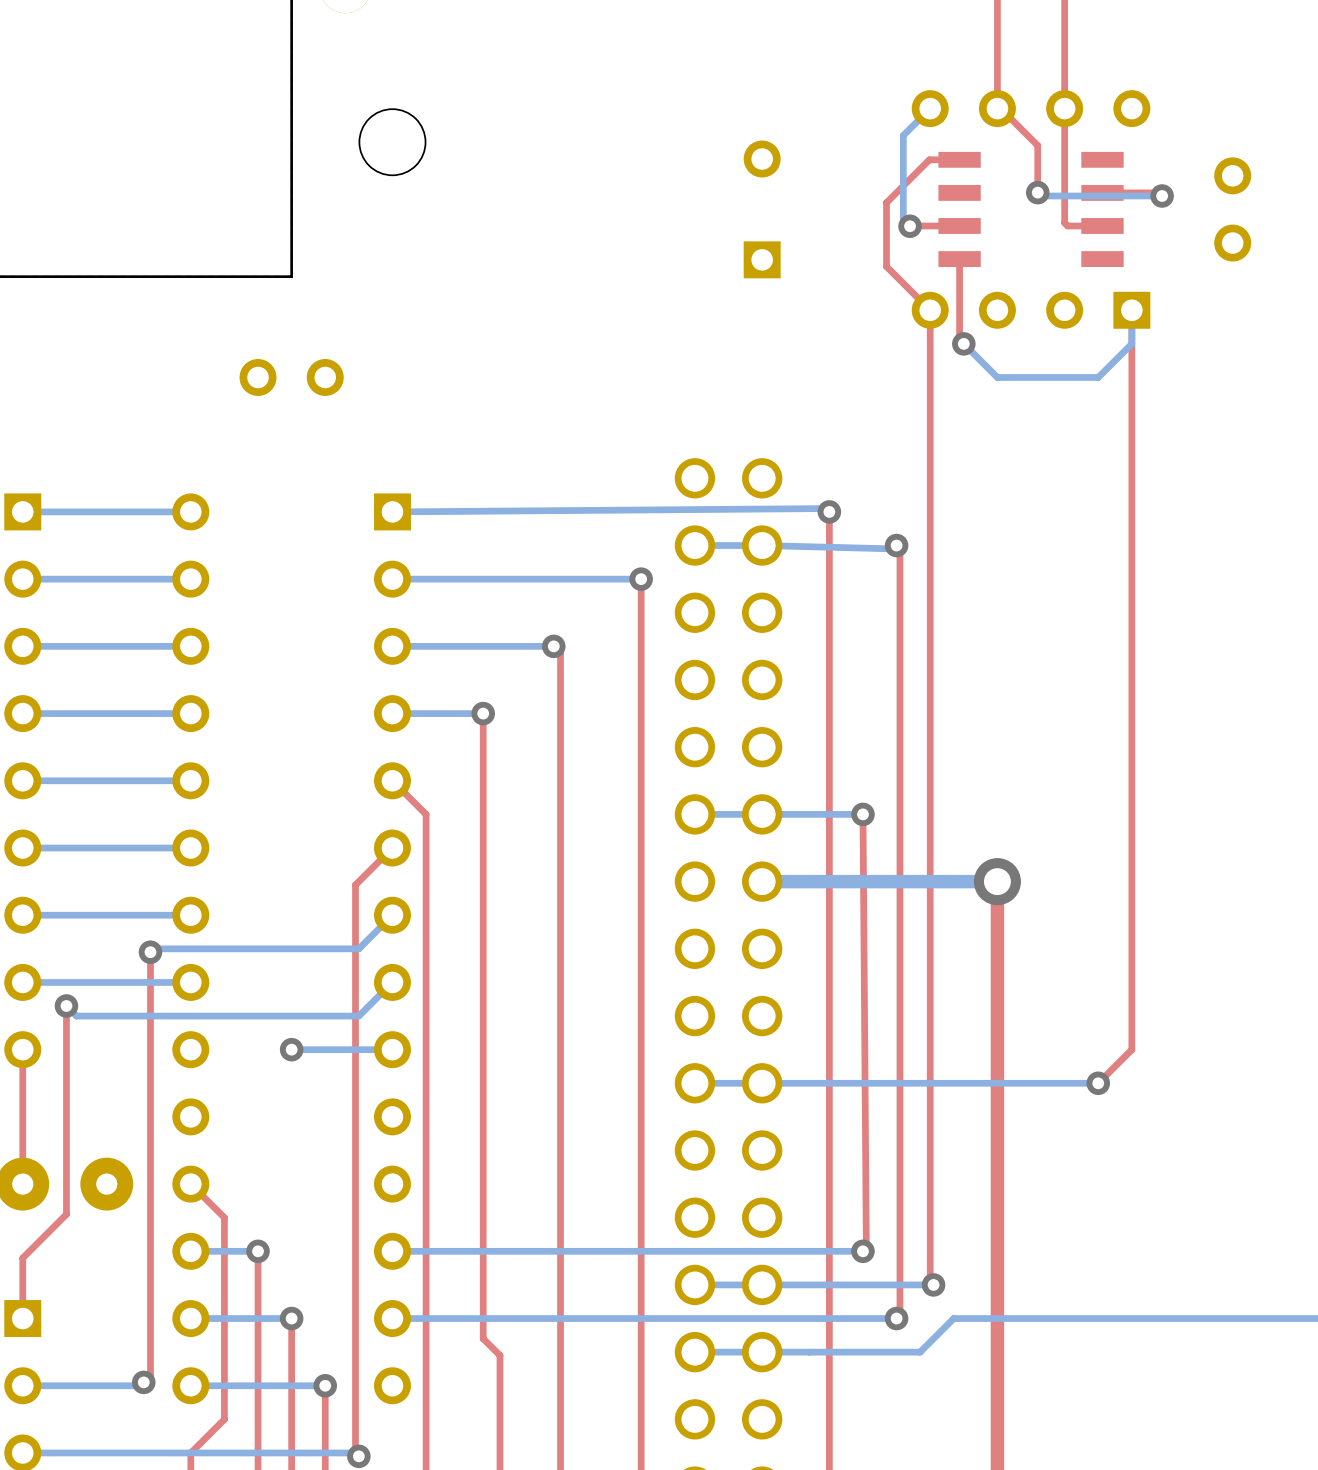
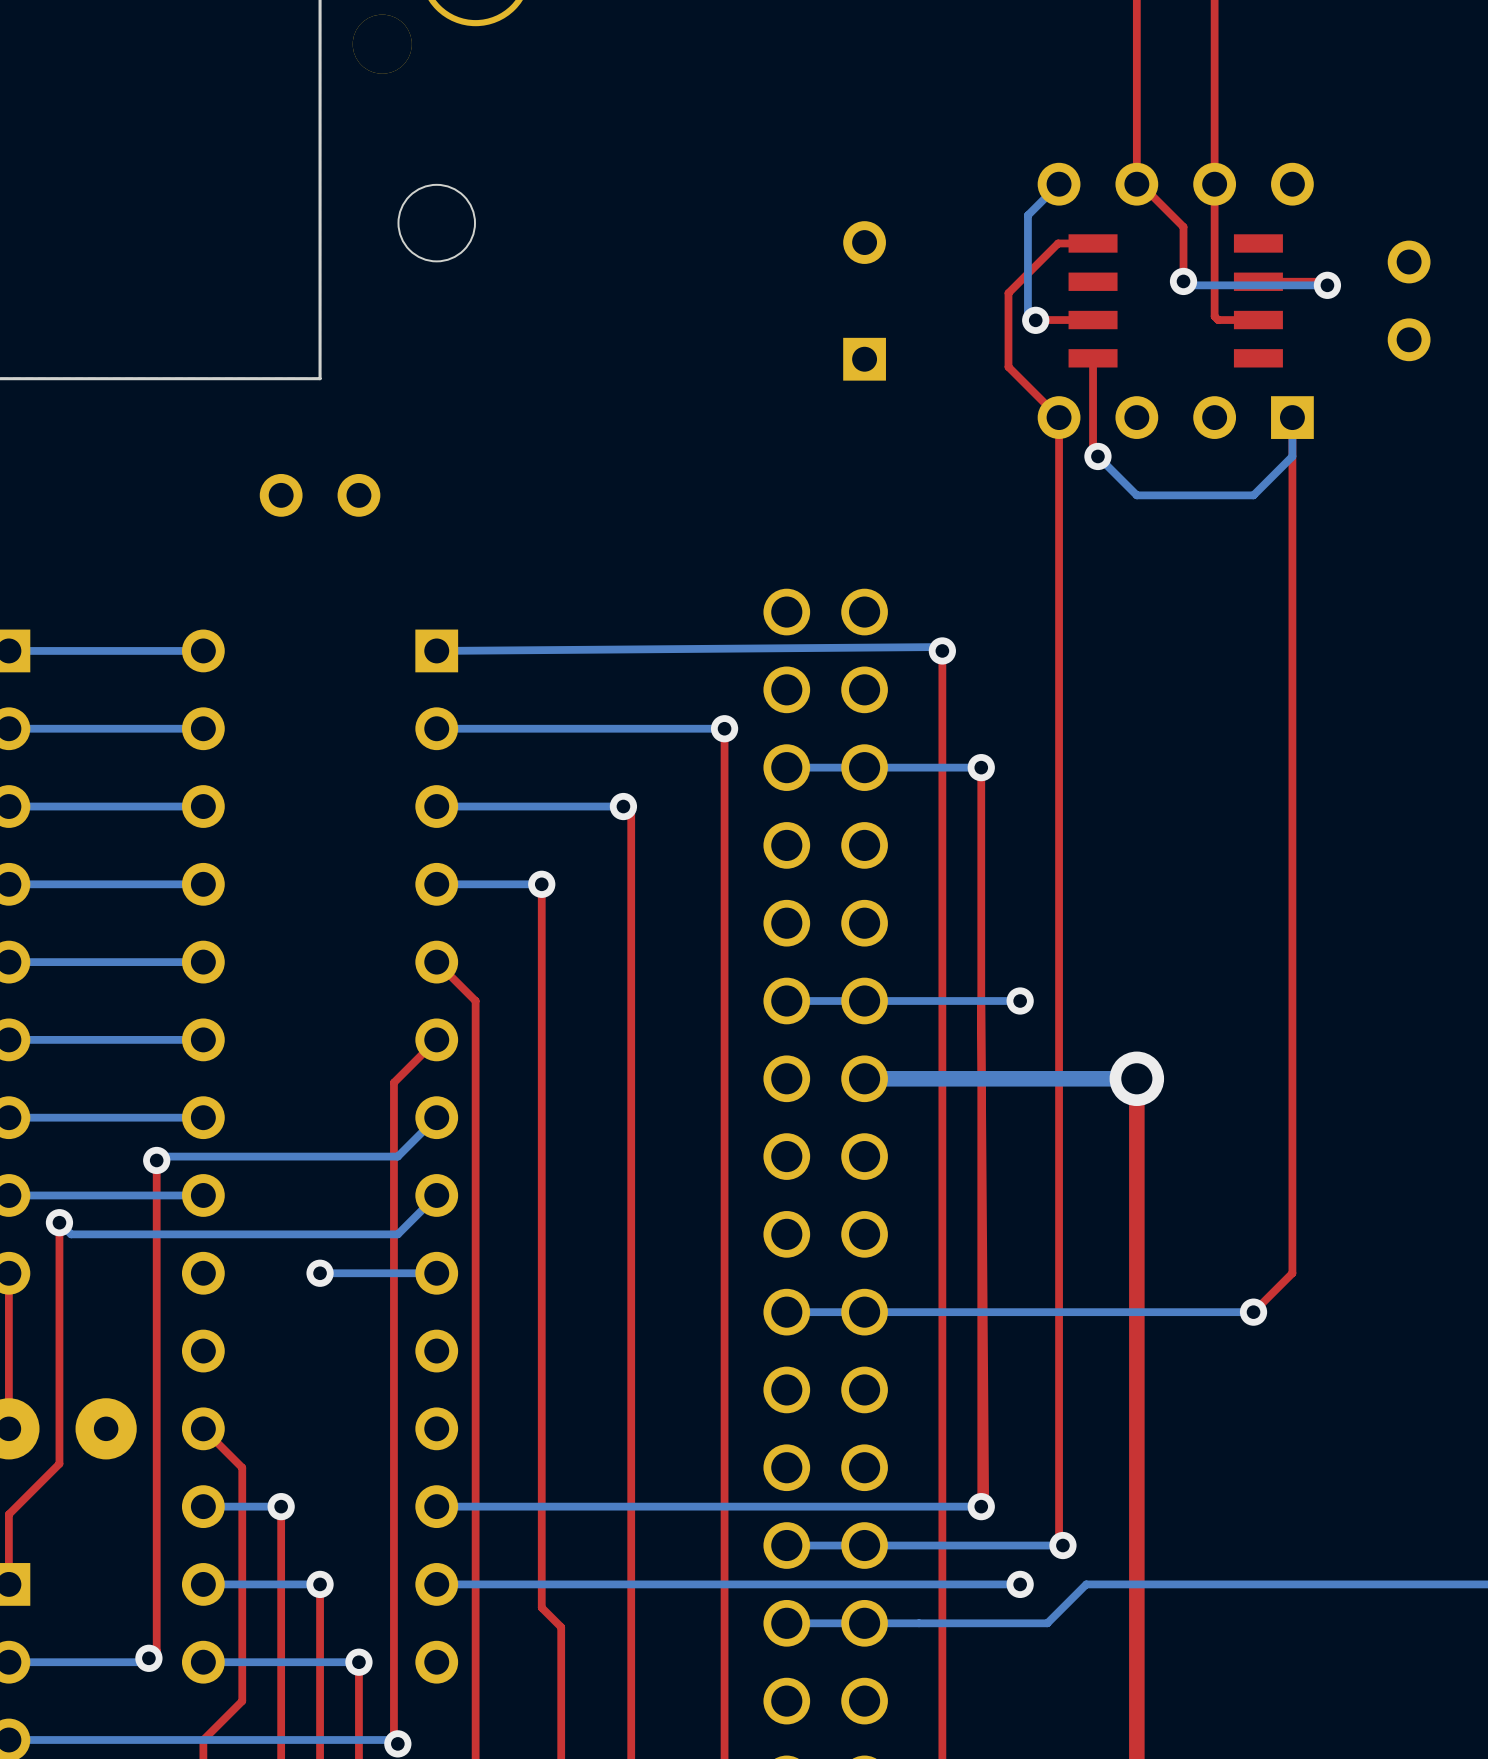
bottom track: (896, 545) (893, 548) (694, 545) -> none
top track: (896, 545) (899, 548) (899, 1315) -> none
via position: (896, 545) -> (981, 767)
bottom track: none -> (981, 767) (786, 767)
top track: none -> (981, 767) (981, 1506)
via position: (862, 814) -> (1020, 1000)
bottom track: none -> (1020, 1000) (981, 1000)

